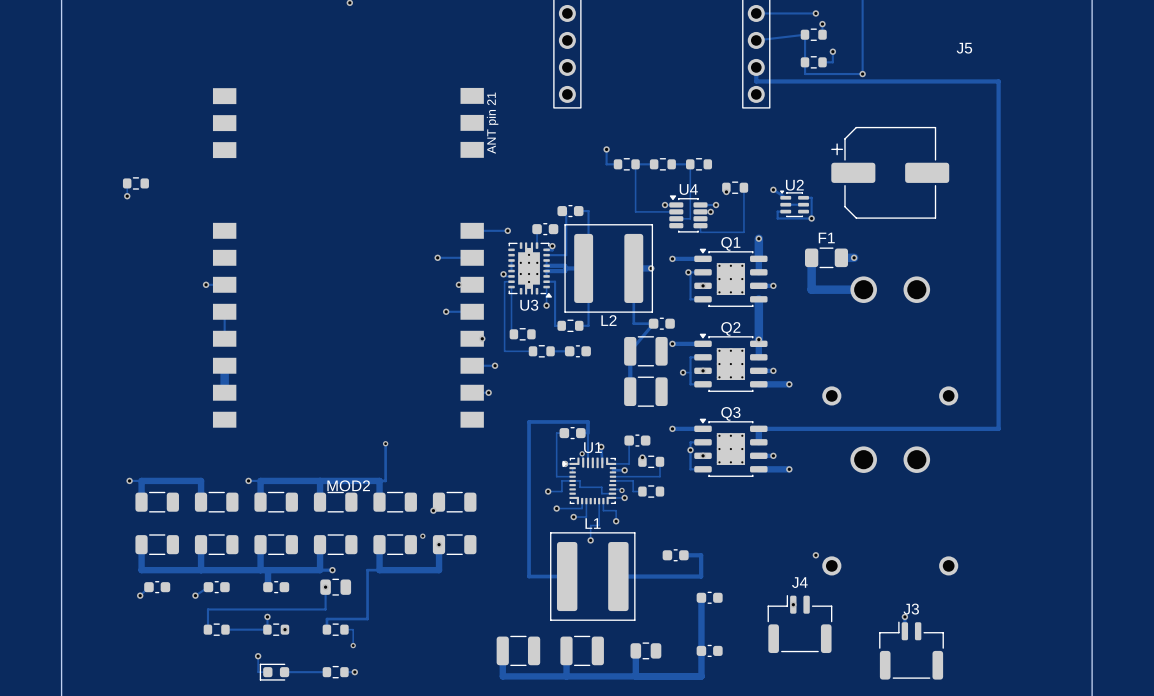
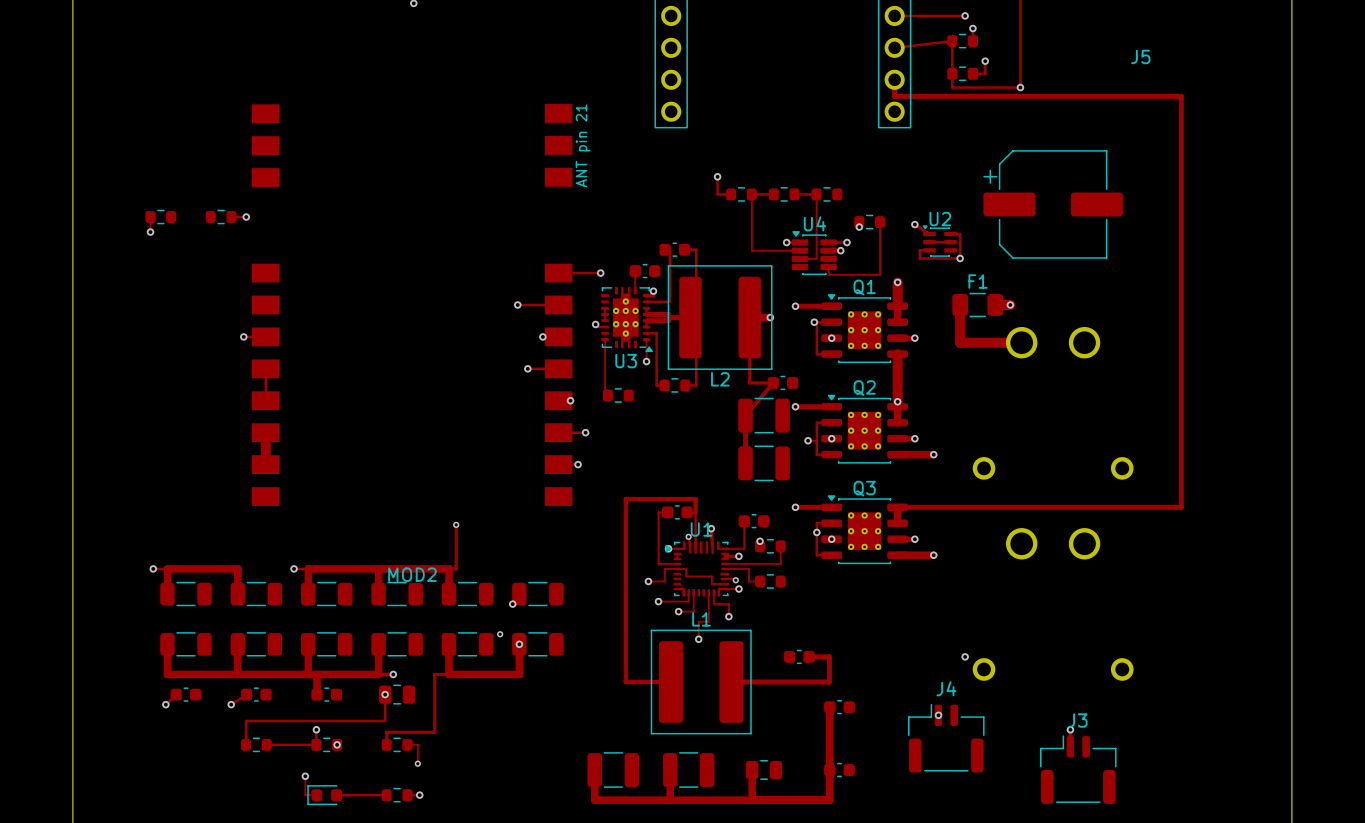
part: none -> (221, 217)
track: none -> (231, 217) (246, 217)
via: none -> (246, 217)
track: (511, 281) (504, 281) (504, 351) (533, 351) -> none
part: (541, 351) -> none
track: (550, 351) (569, 351) -> none
part: (577, 351) -> none

